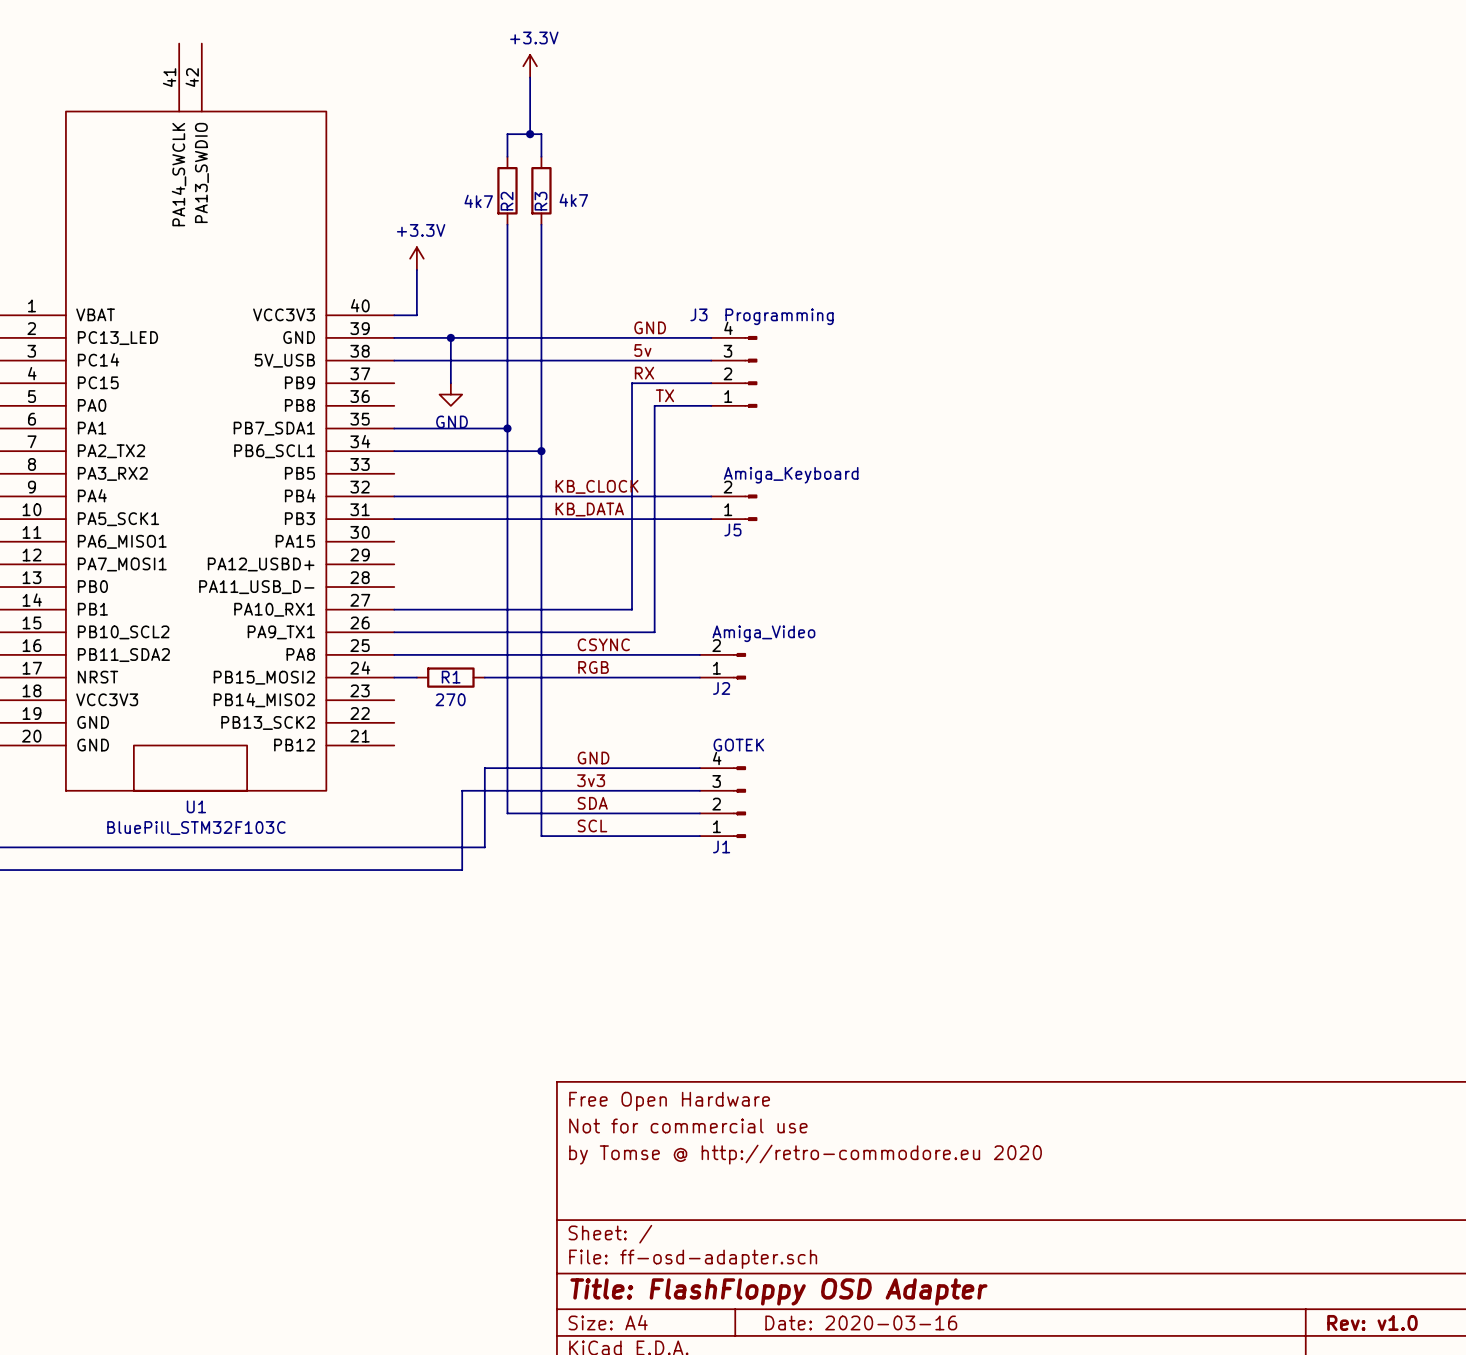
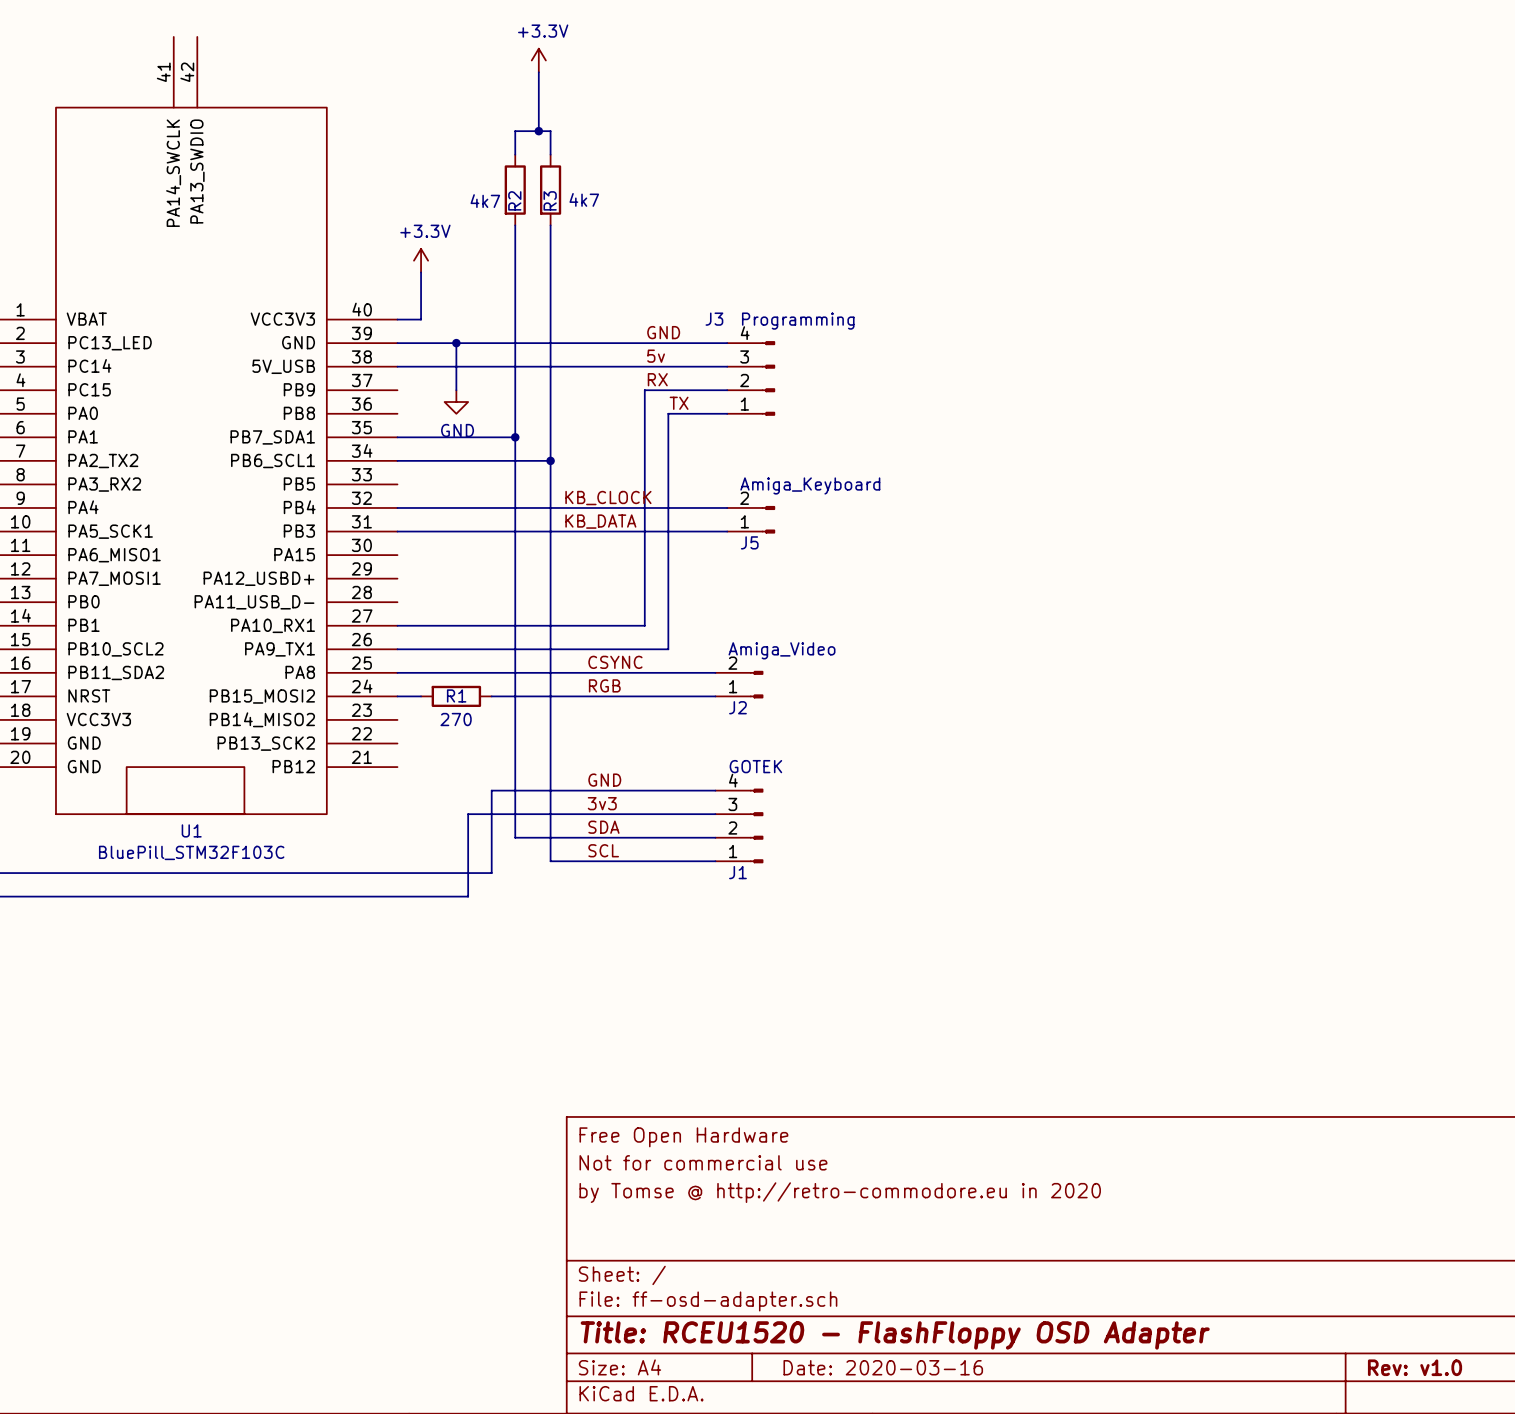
title block: by Tomse @ http://retro-commodore.eu 2020 (805, 1154) -> by Tomse @ http://retro-commodore.eu in 2020 (840, 1192)
title block: Title: FlashFloppy OSD Adapter (778, 1291) -> Title: RCEU1520 - FlashFloppy OSD Adapter (895, 1335)

